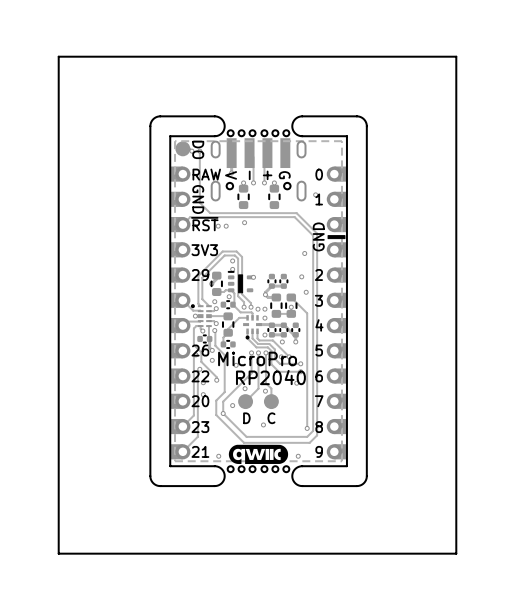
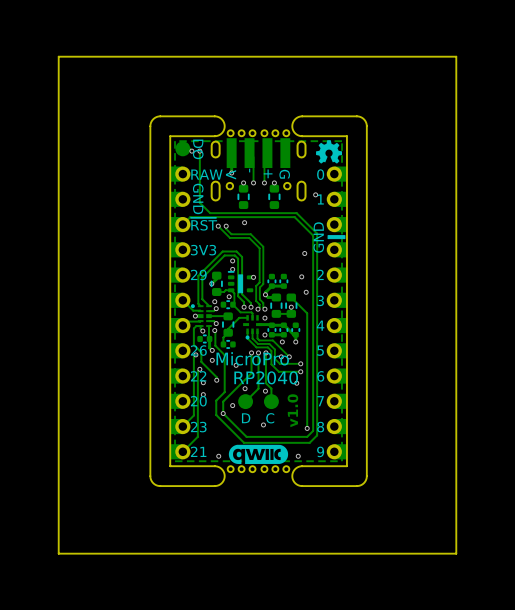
drawing: none -> [316, 140, 343, 164]
track: none -> (218, 226) (230, 237) (249, 237) (259, 248) (259, 282) (256, 286) (256, 300) (259, 304) (258, 309)
track: none -> (226, 226) (226, 228) (231, 234) (250, 234) (263, 246) (263, 284) (259, 287) (259, 299) (264, 309)
text: none -> v1.0 (292, 410)
drawing: none -> [268, 448, 271, 461]

